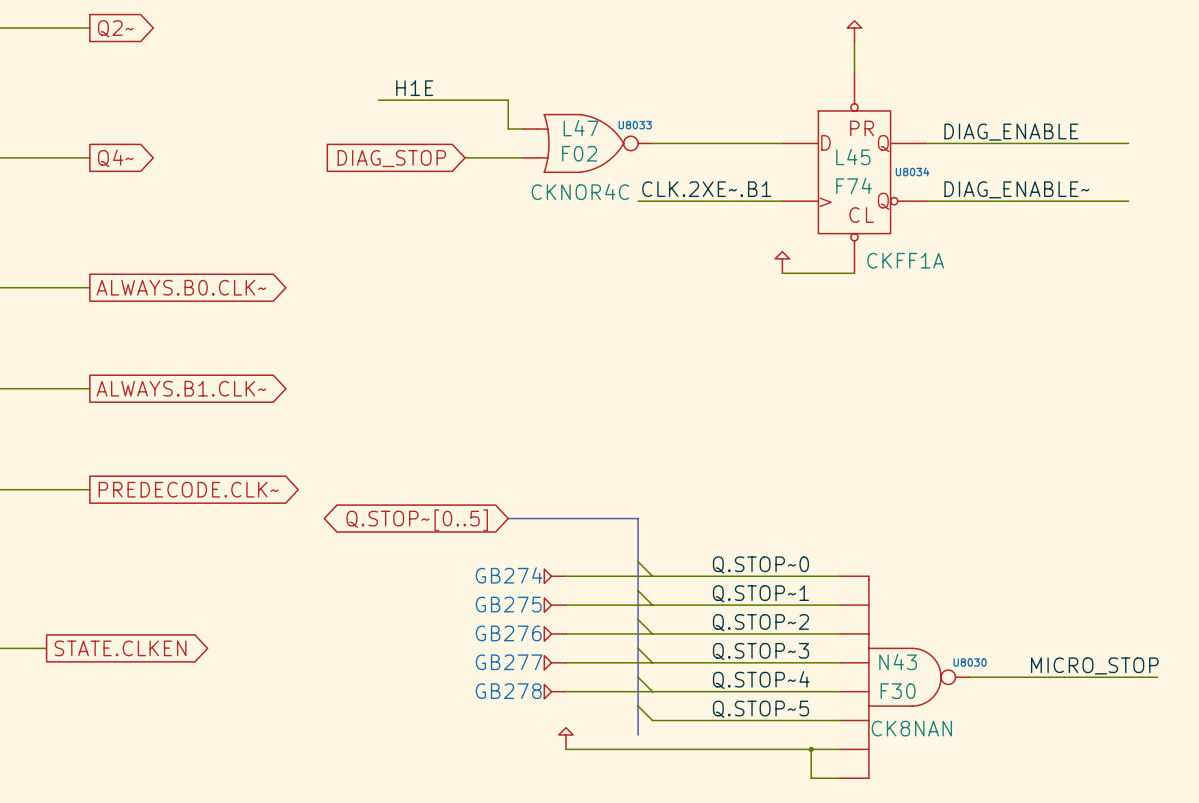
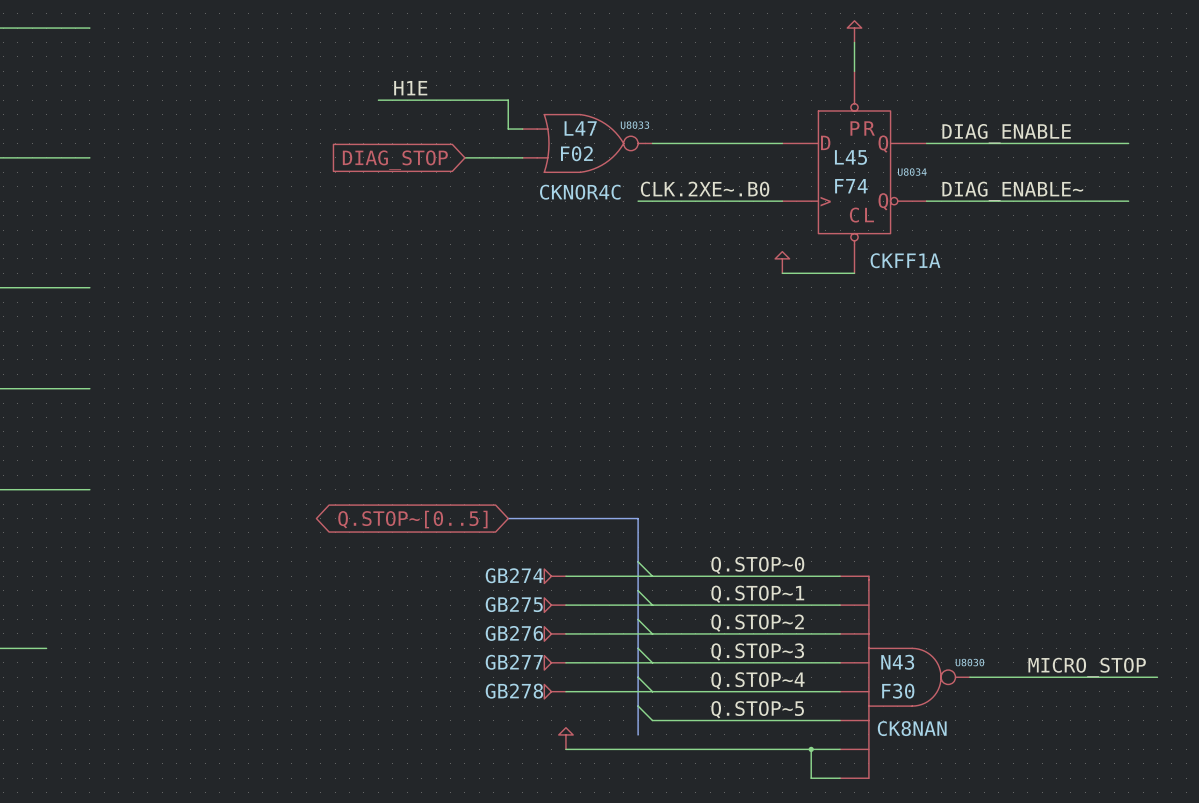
global label: Q2~ (115, 28) -> none
global label: Q4~ (115, 158) -> none
label: CLK.2XE~.B1 (706, 189) -> CLK.2XE~.B0 (705, 189)
global label: ALWAYS.B0.CLK~ (181, 287) -> none
global label: ALWAYS.B1.CLK~ (181, 388) -> none
global label: PREDECODE.CLK~ (188, 489) -> none
global label: STATE.CLKEN (120, 648) -> none

